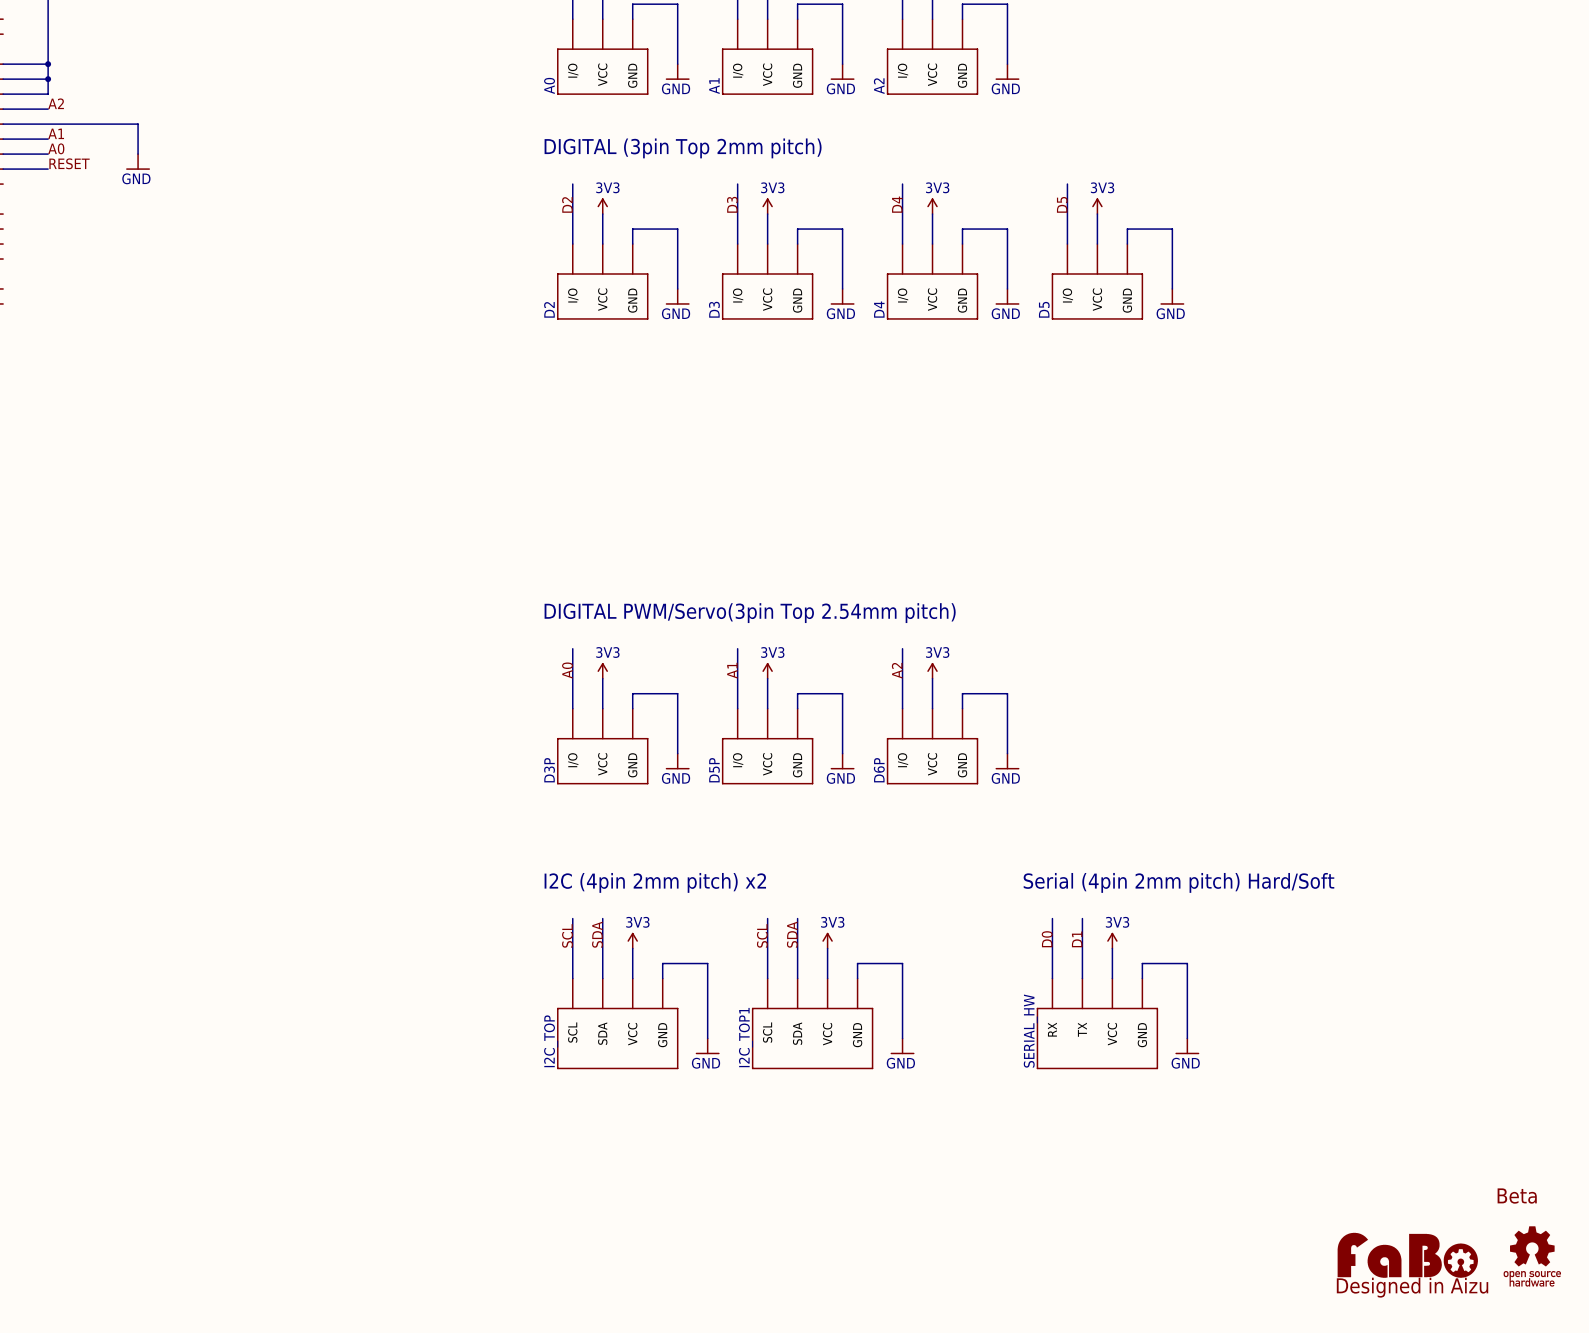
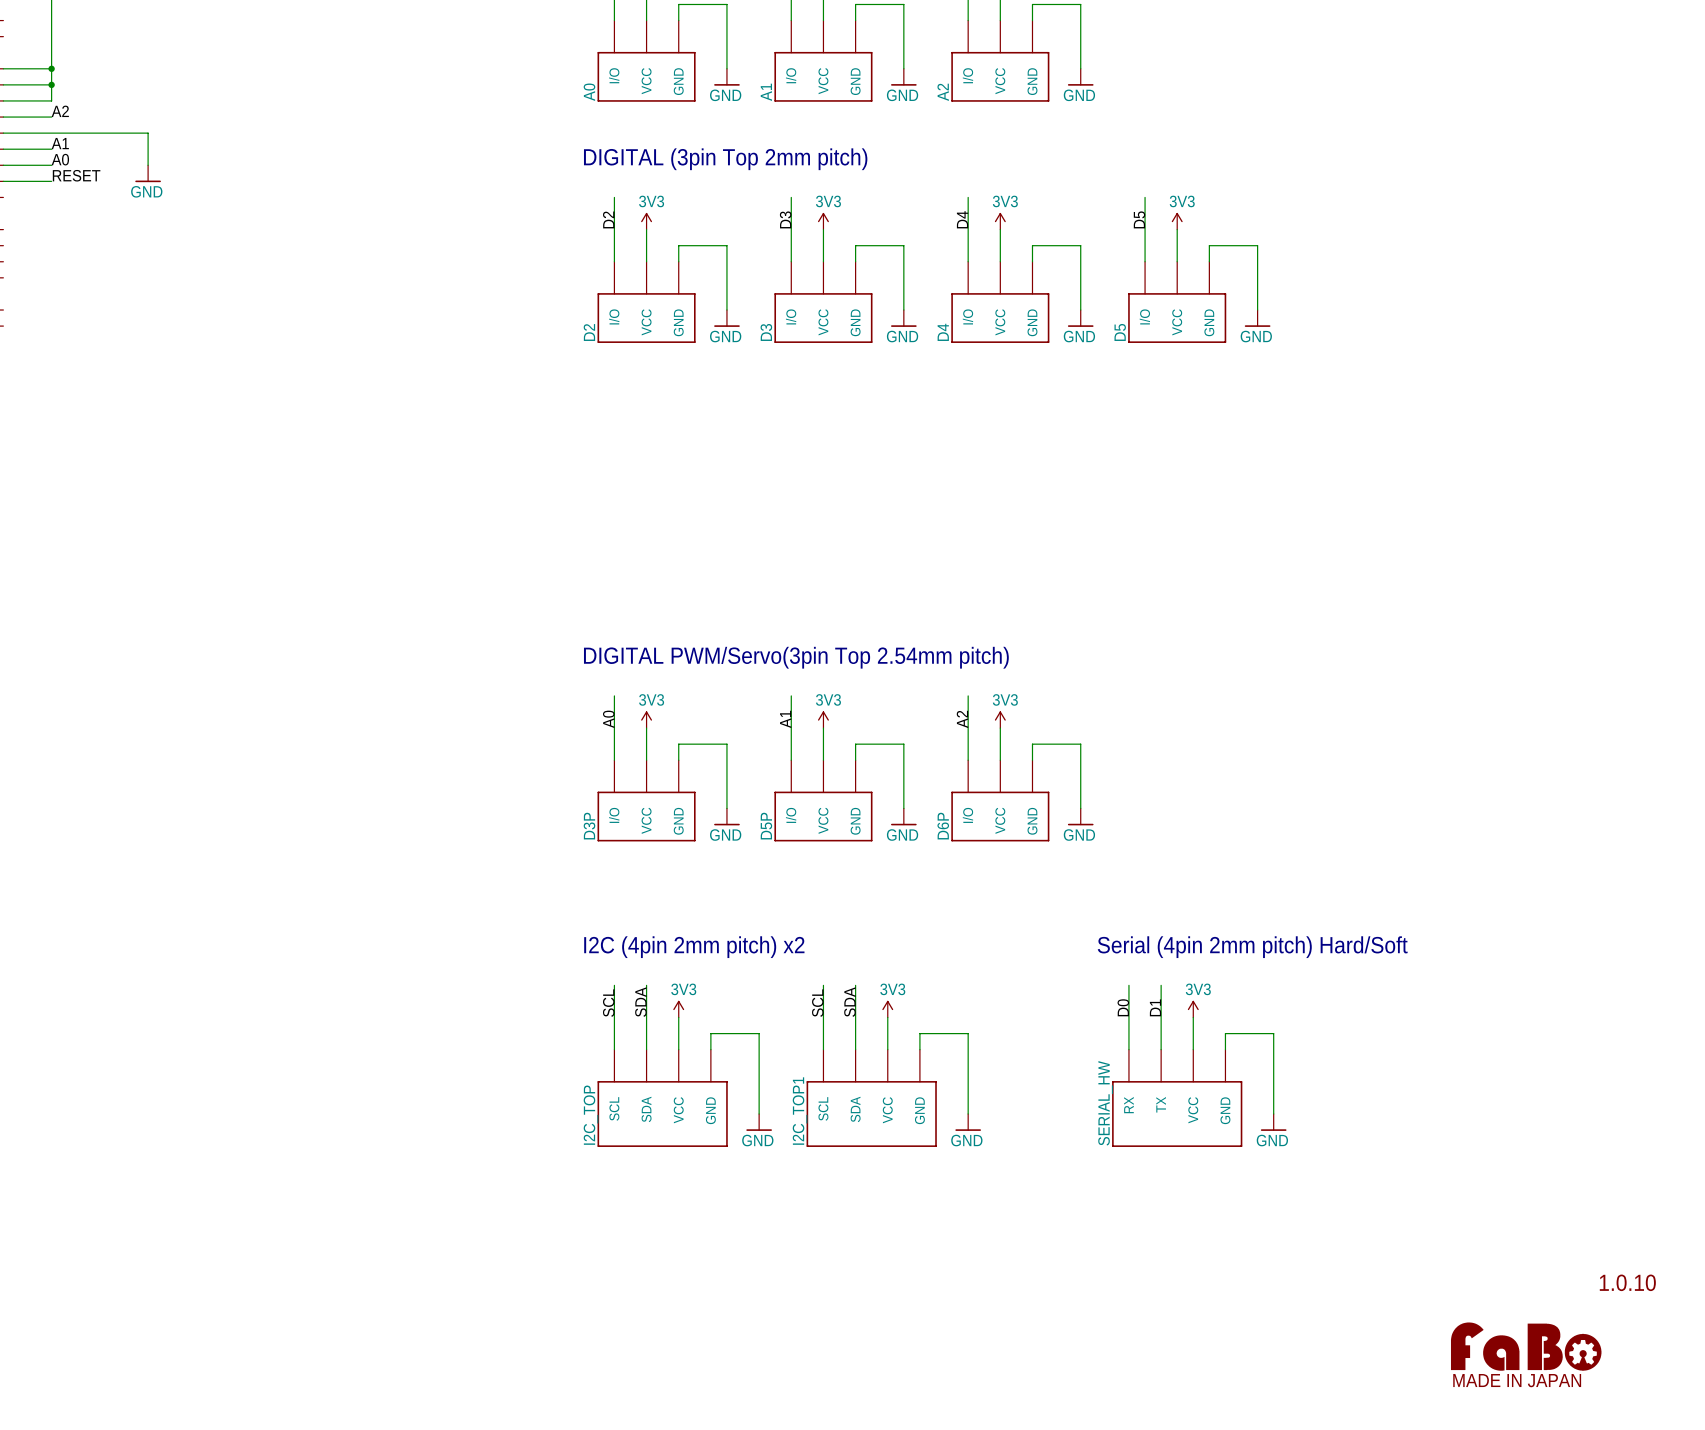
text: Beta (1517, 1196) -> 1.0.10 (1627, 1282)
part: (1407, 1255) -> none
part: none -> (1526, 1346)
part: (1532, 1256) -> none

